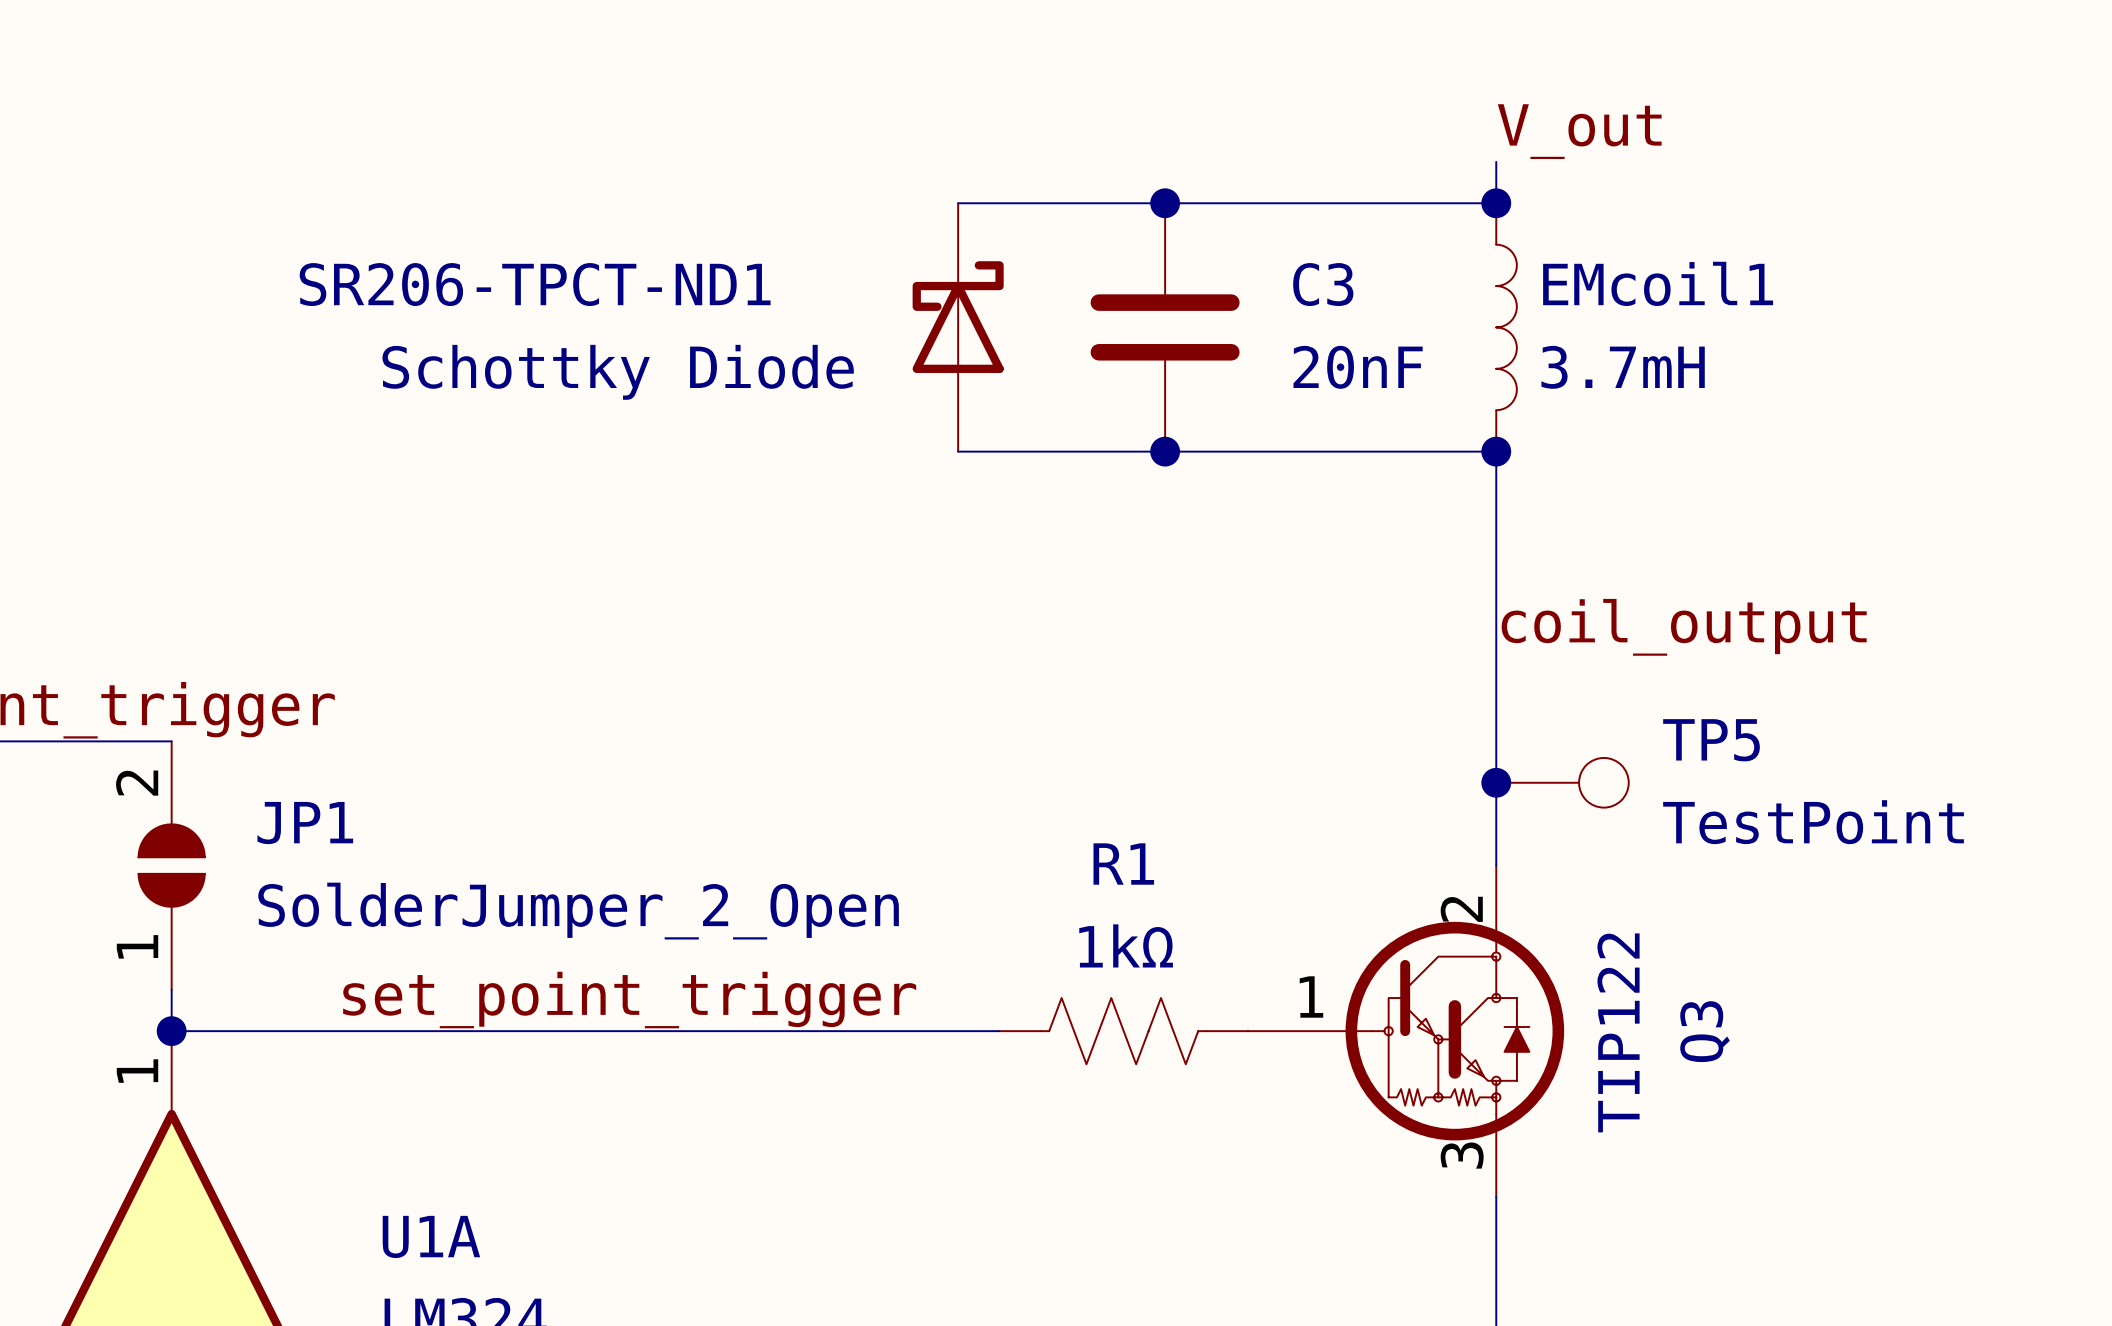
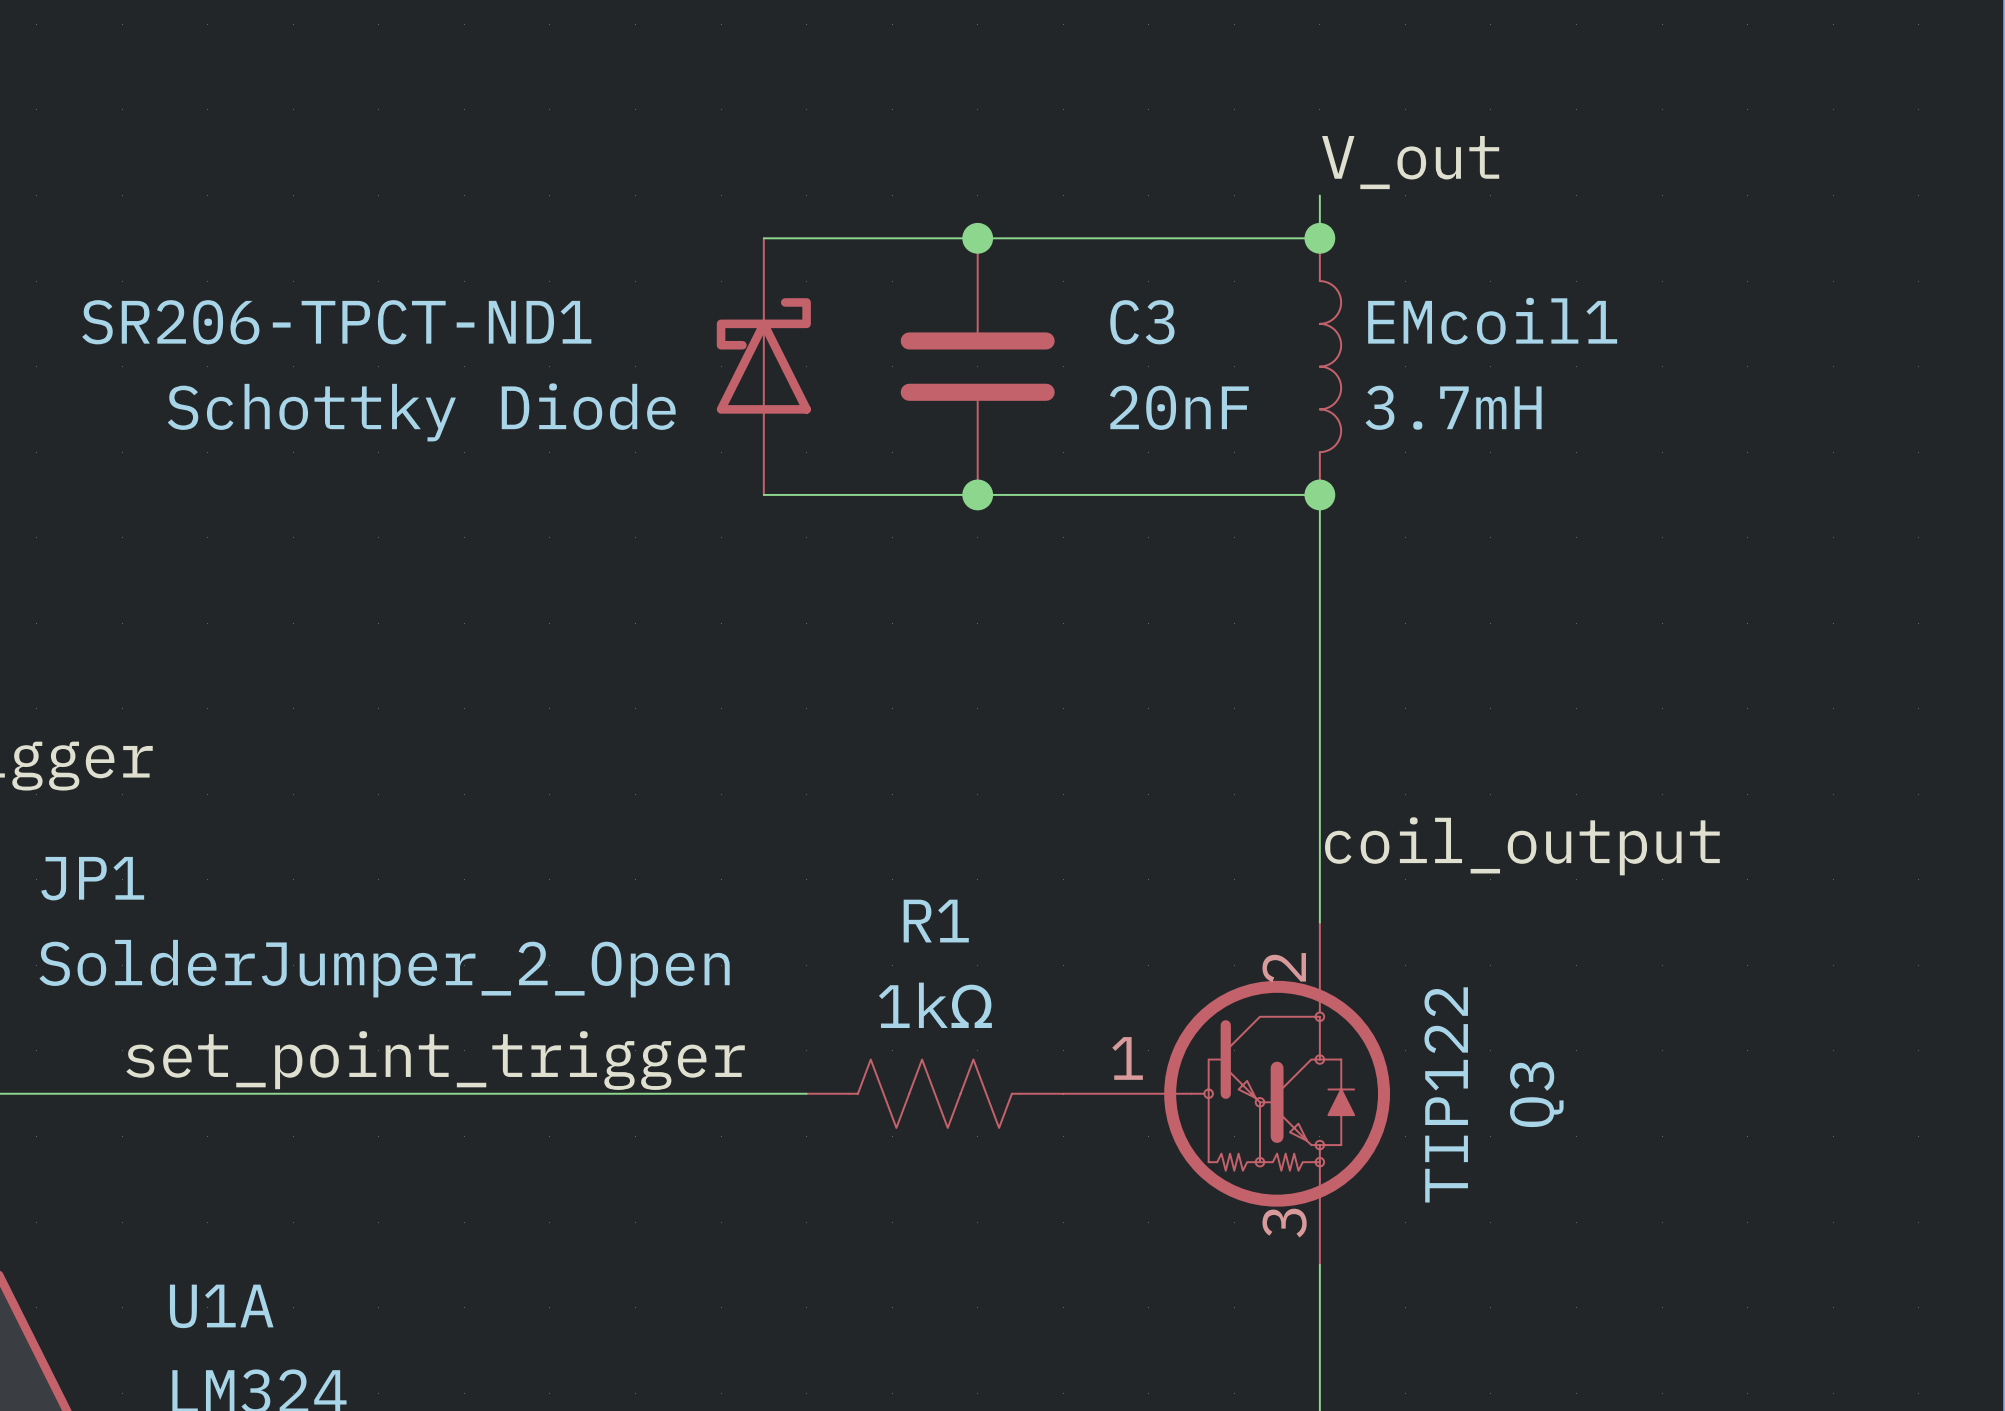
label position: coil_output (1684, 627) -> coil_output (1522, 846)
junction: (1496, 782) -> none
TP5: TestPoint (1562, 782) -> none

